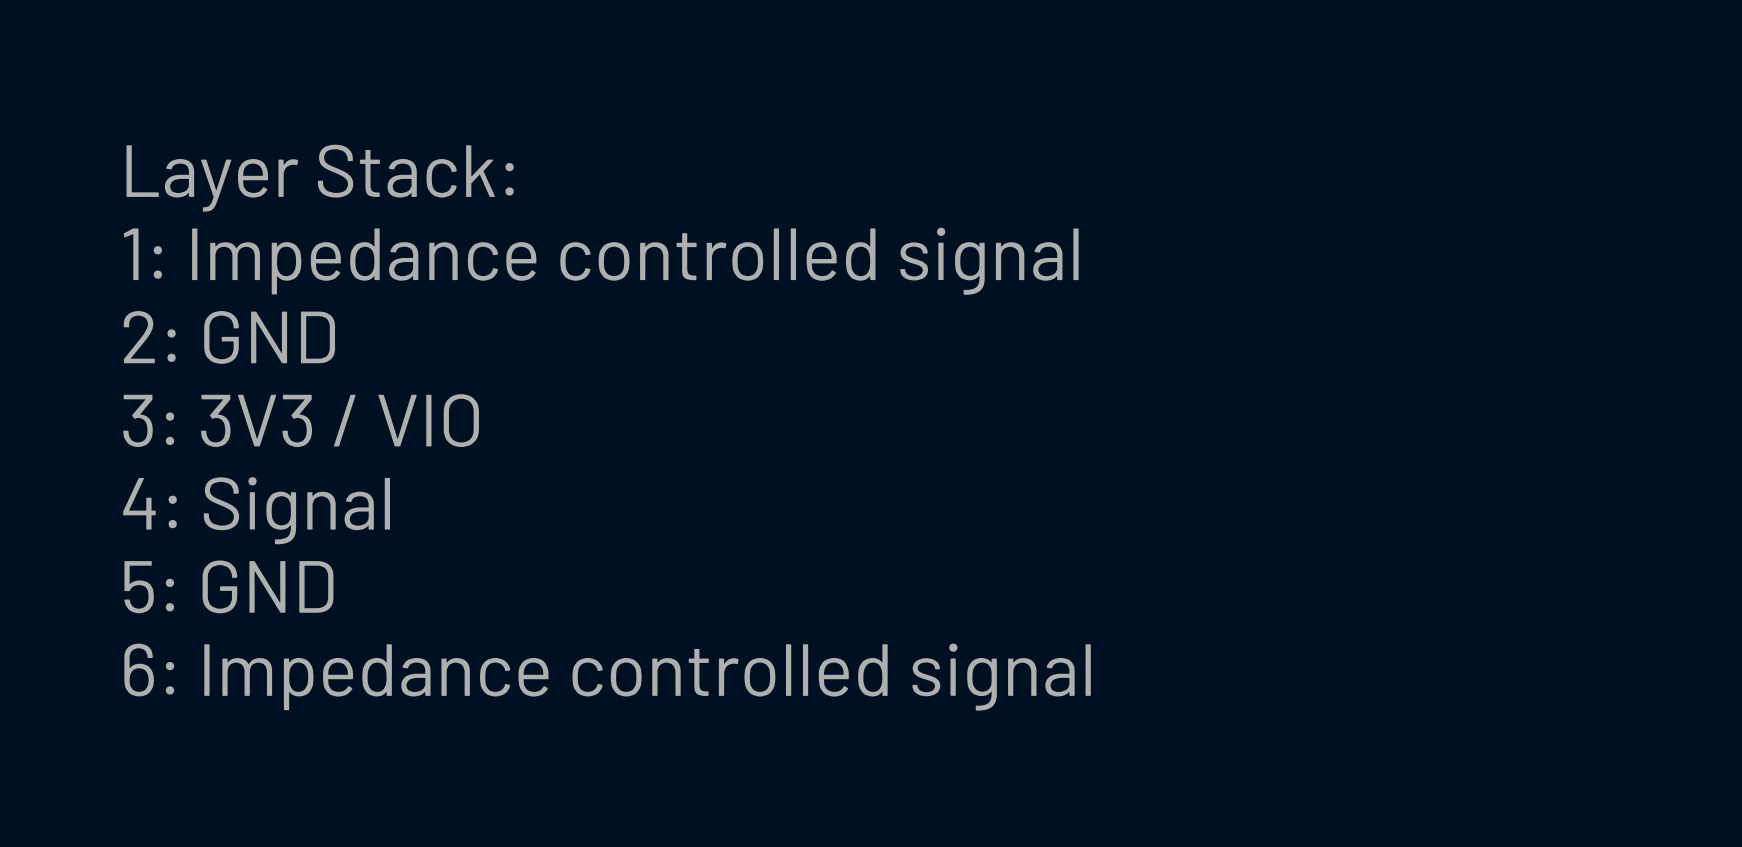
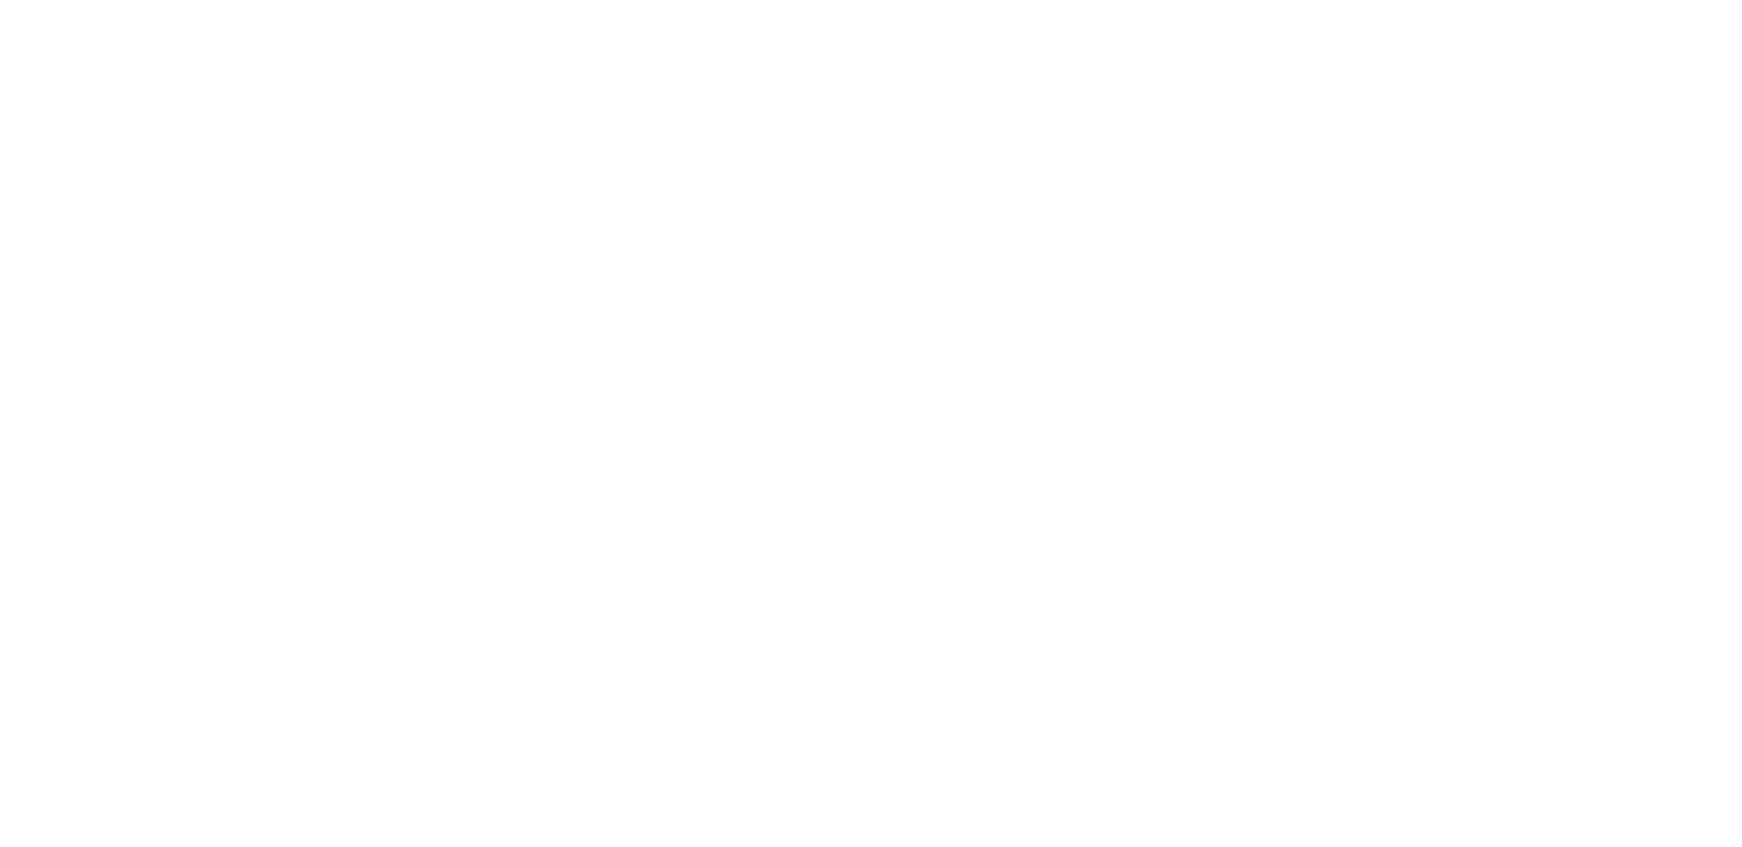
text: Layer Stack: (320, 178) -> none
text: 1: Impedance controlled signal (601, 261) -> none
text: 2: GND (229, 337) -> none
text: 3: 3V3 / VIO (301, 420) -> none
text: 4: Signal (256, 510) -> none
text: 5: GND (228, 586) -> none
text: 6: Impedance controlled signal (607, 677) -> none

